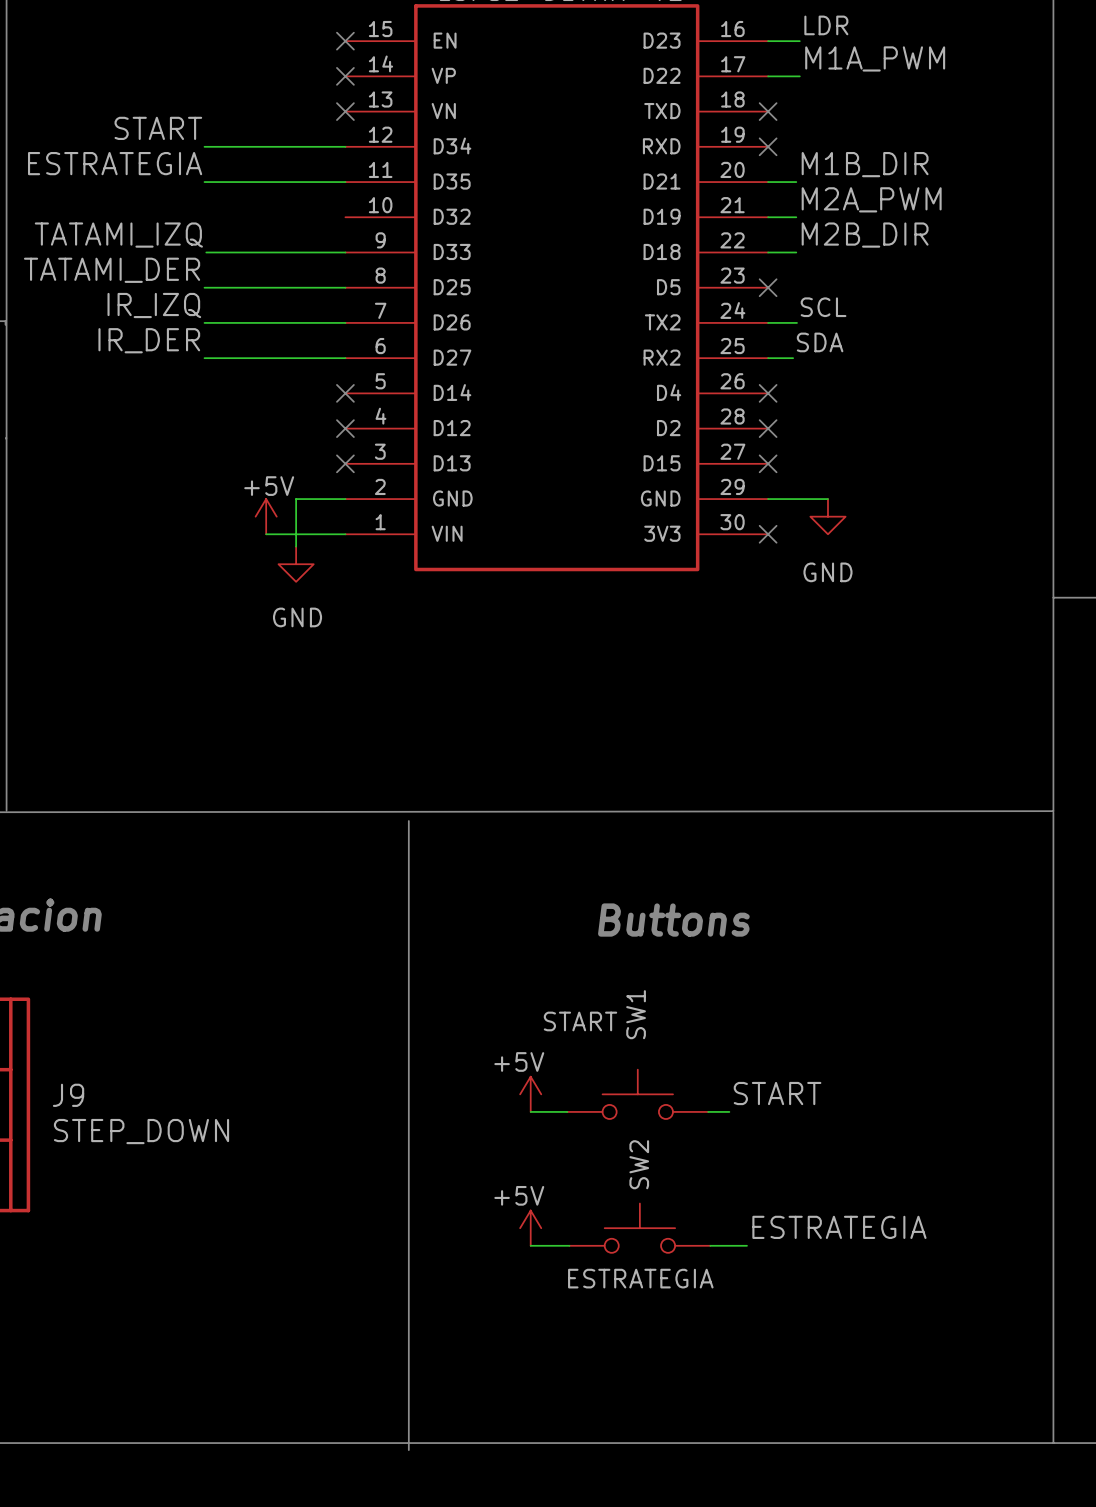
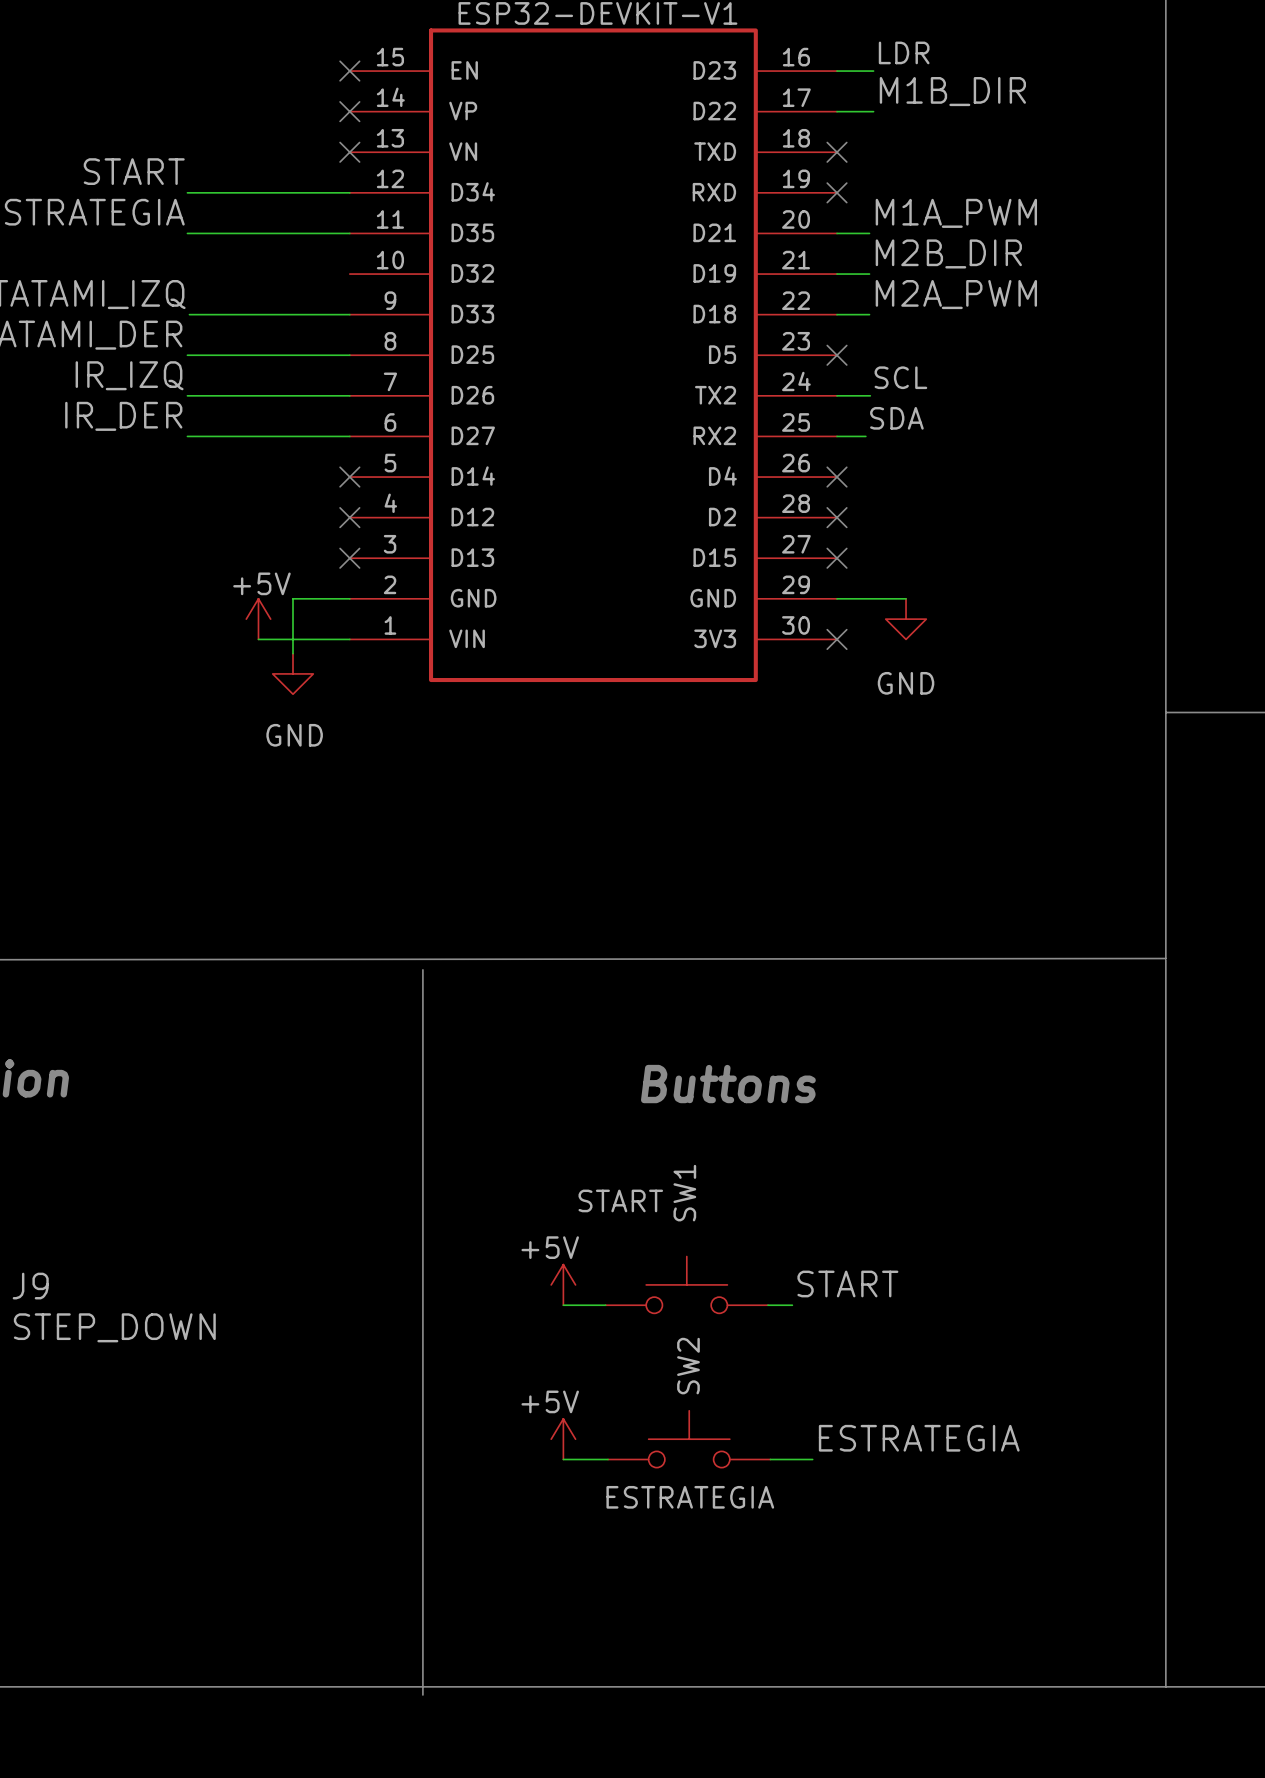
label: M1A_PWM (875, 58) -> M1B_DIR (952, 91)
label: M1B_DIR (865, 164) -> M1A_PWM (956, 213)
label: M2A_PWM (871, 199) -> M2B_DIR (948, 253)
label: M2B_DIR (865, 235) -> M2A_PWM (956, 294)

